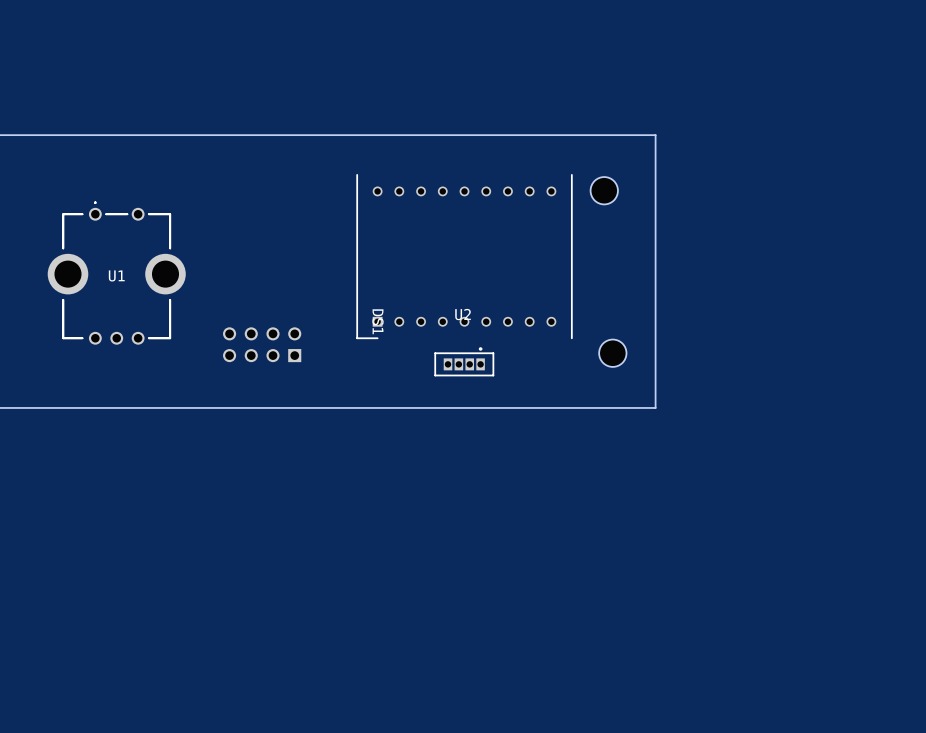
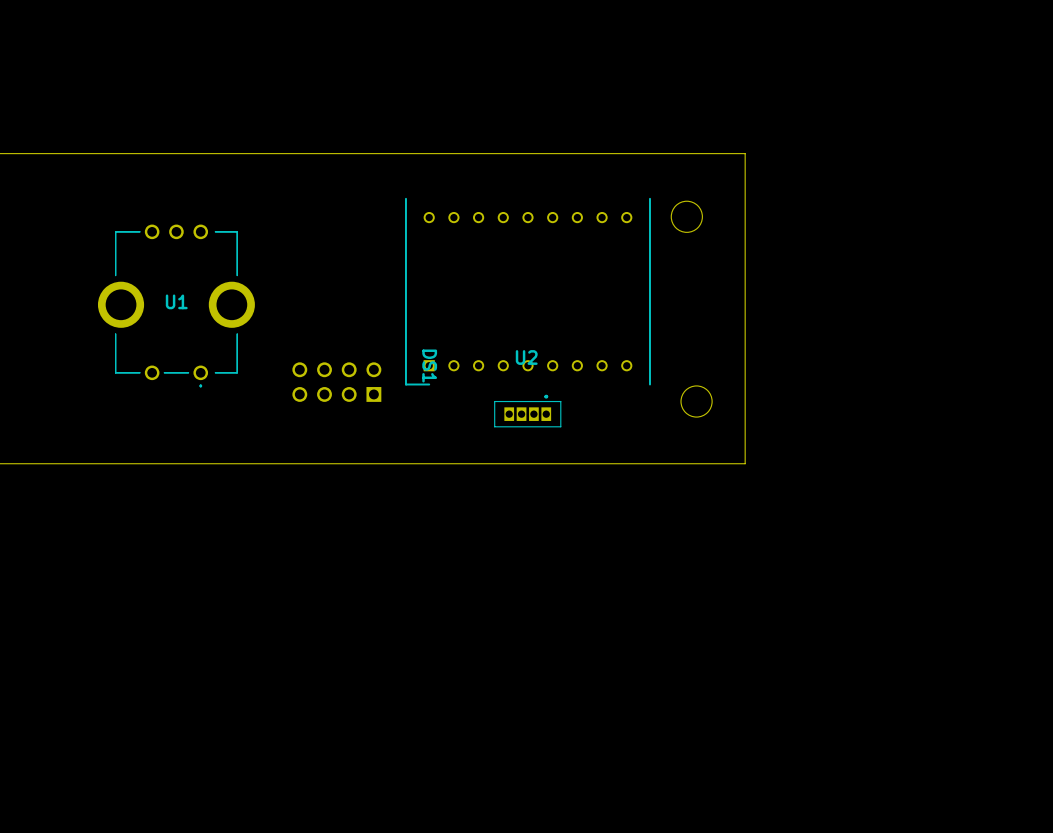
U1 rotation: 0° (116, 273) -> 180° (176, 305)
part position: (262, 344) -> (336, 382)

